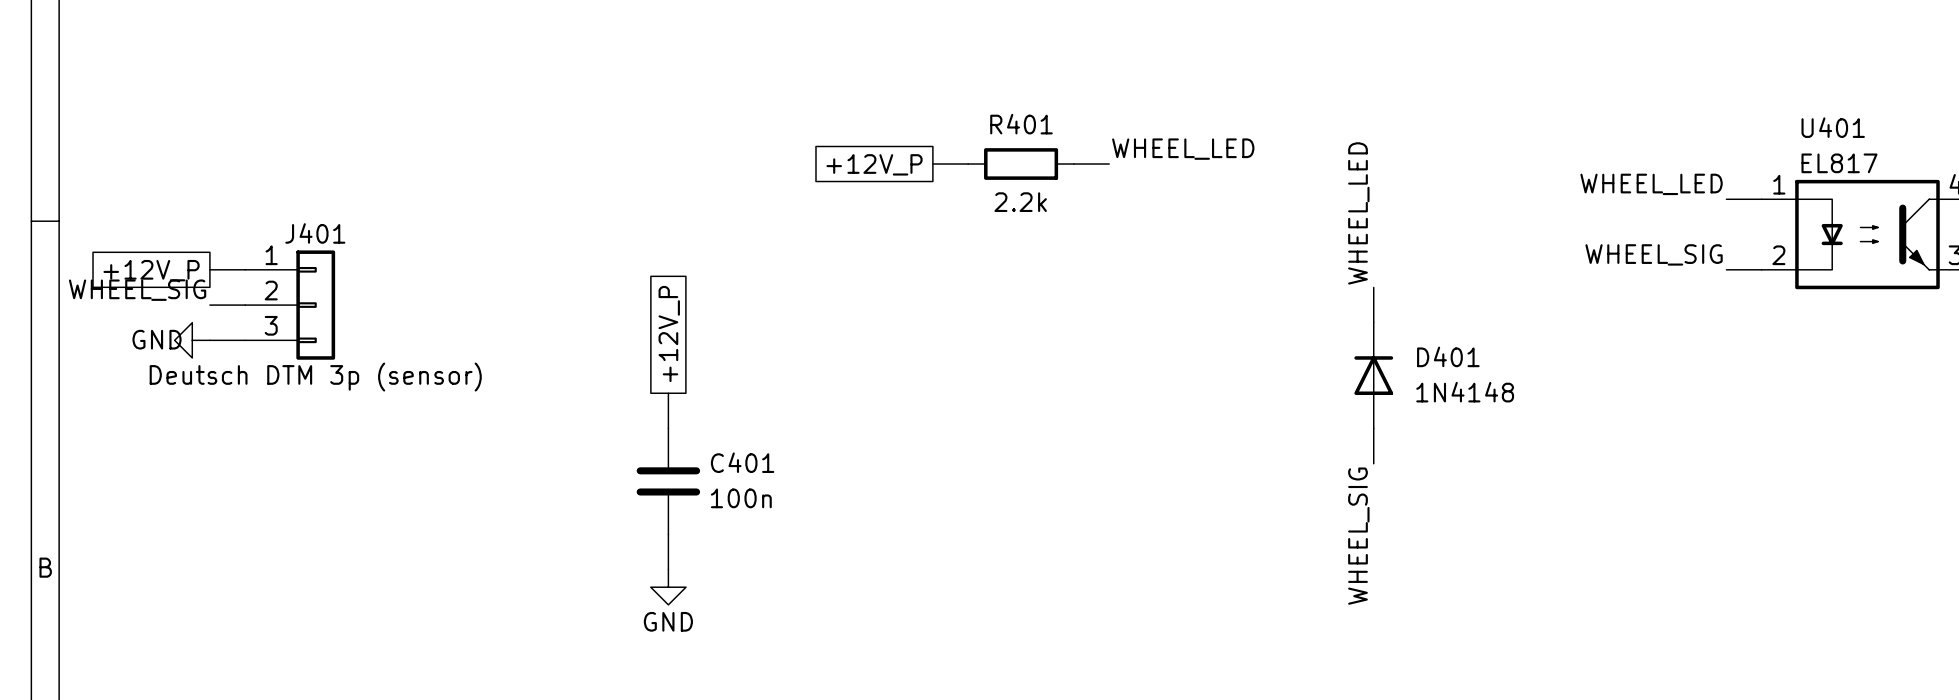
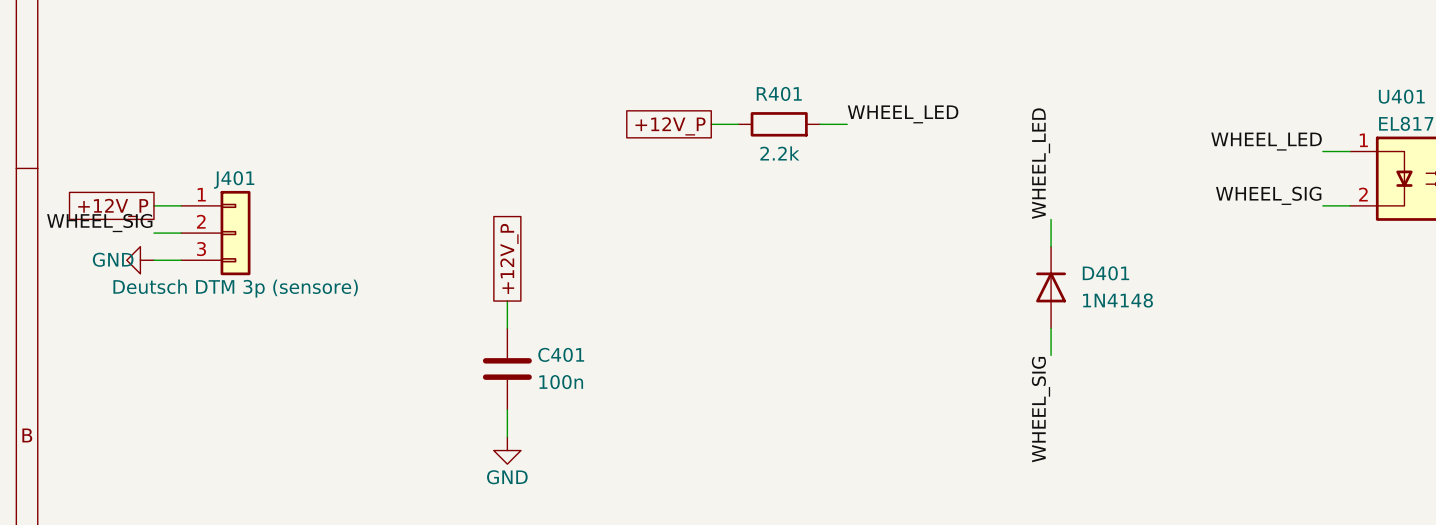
J401 value: Deutsch DTM 3p (sensor) (315, 377) -> Deutsch DTM 3p (sensore) (235, 288)

